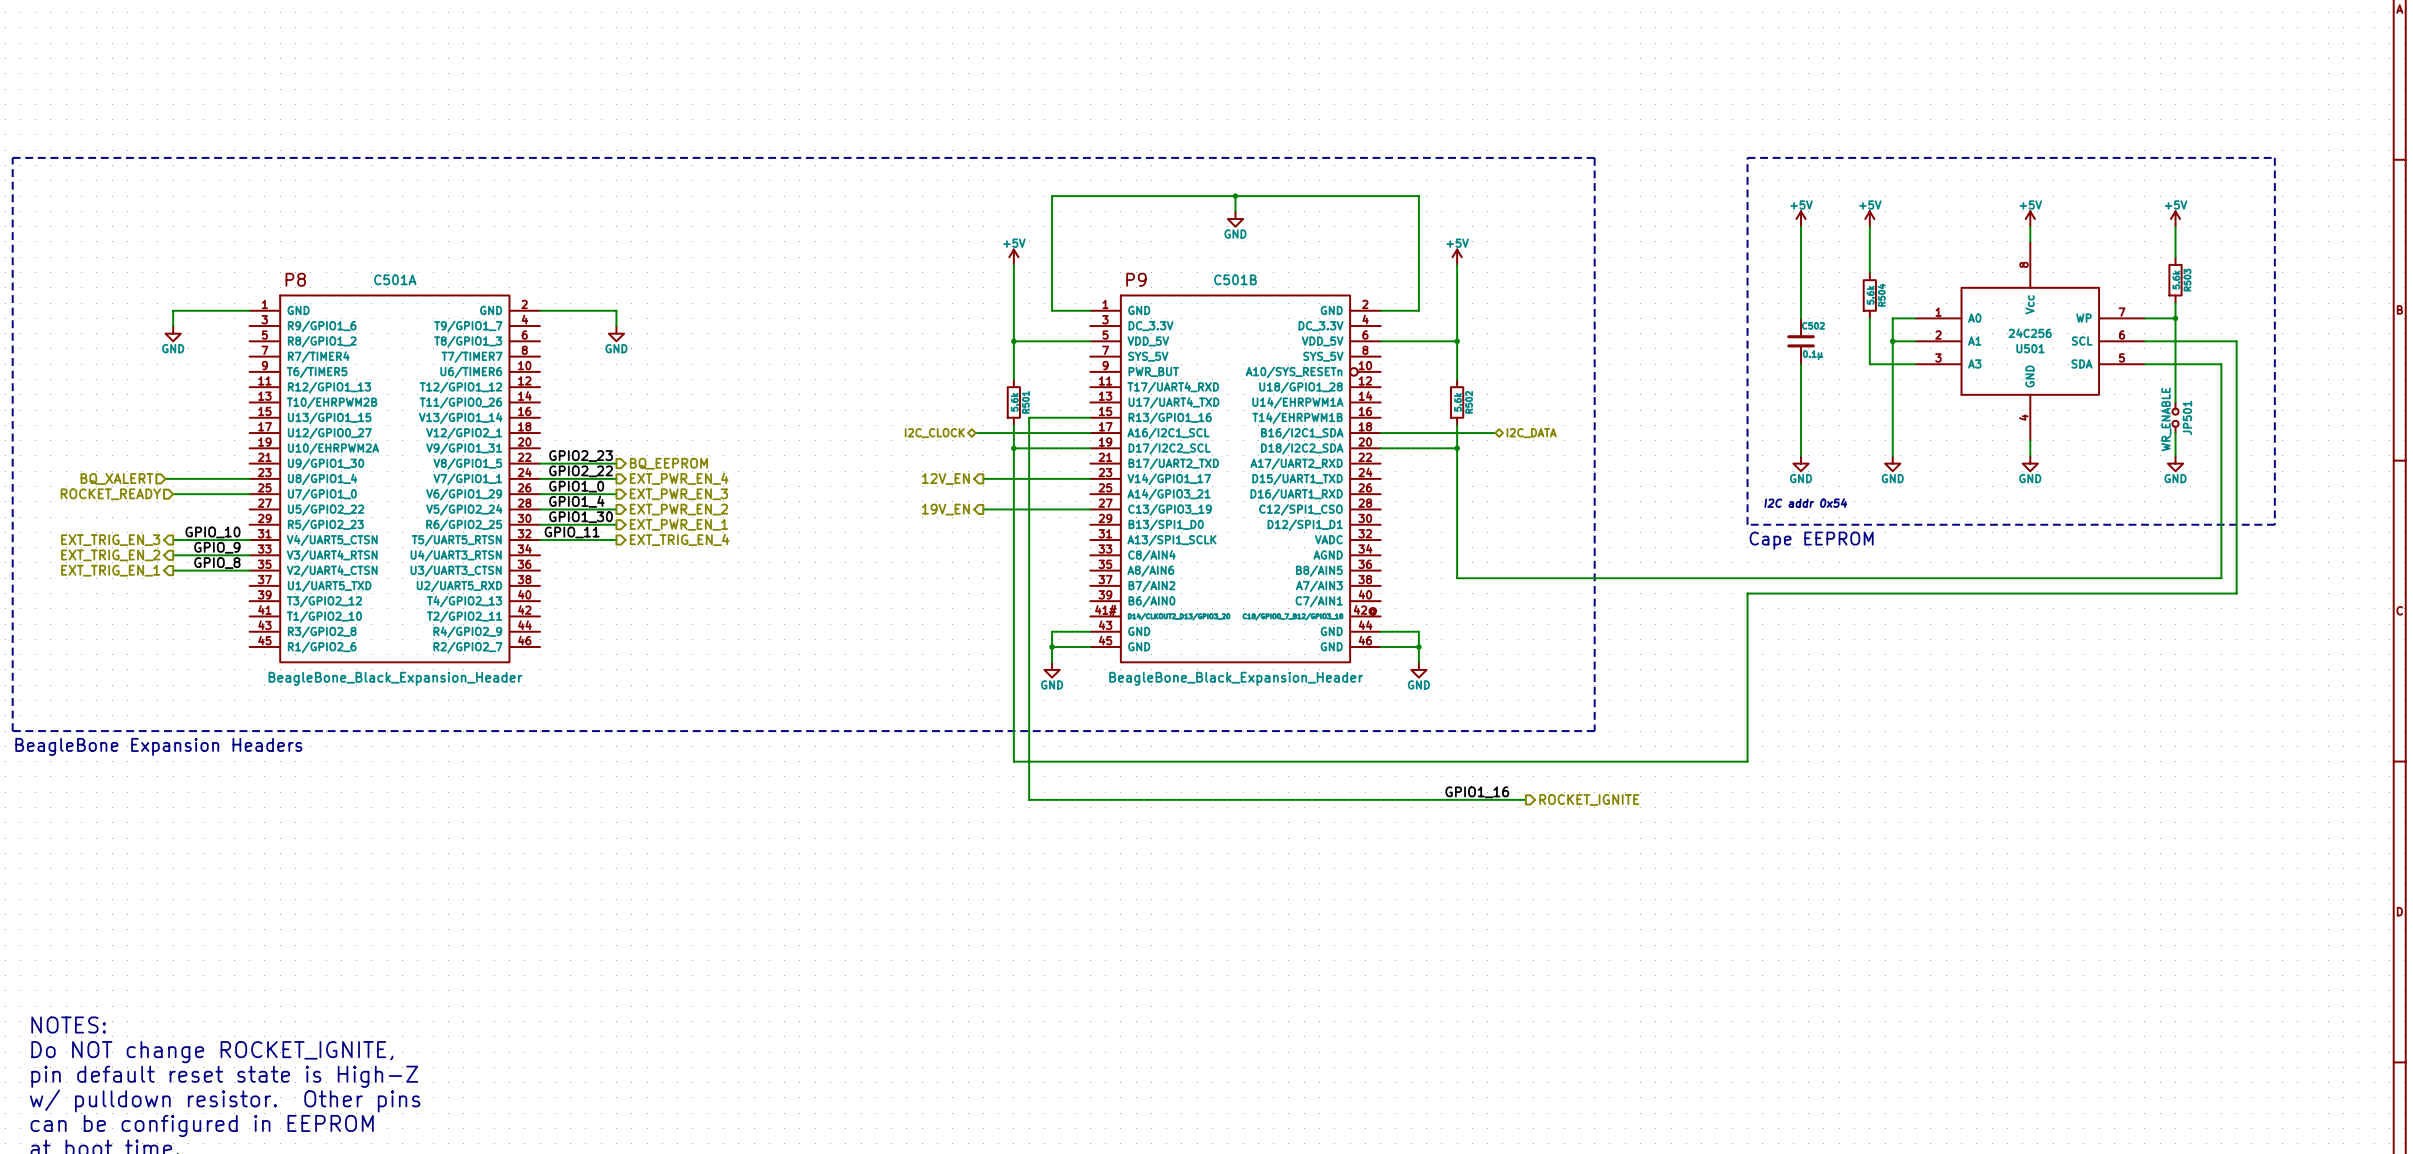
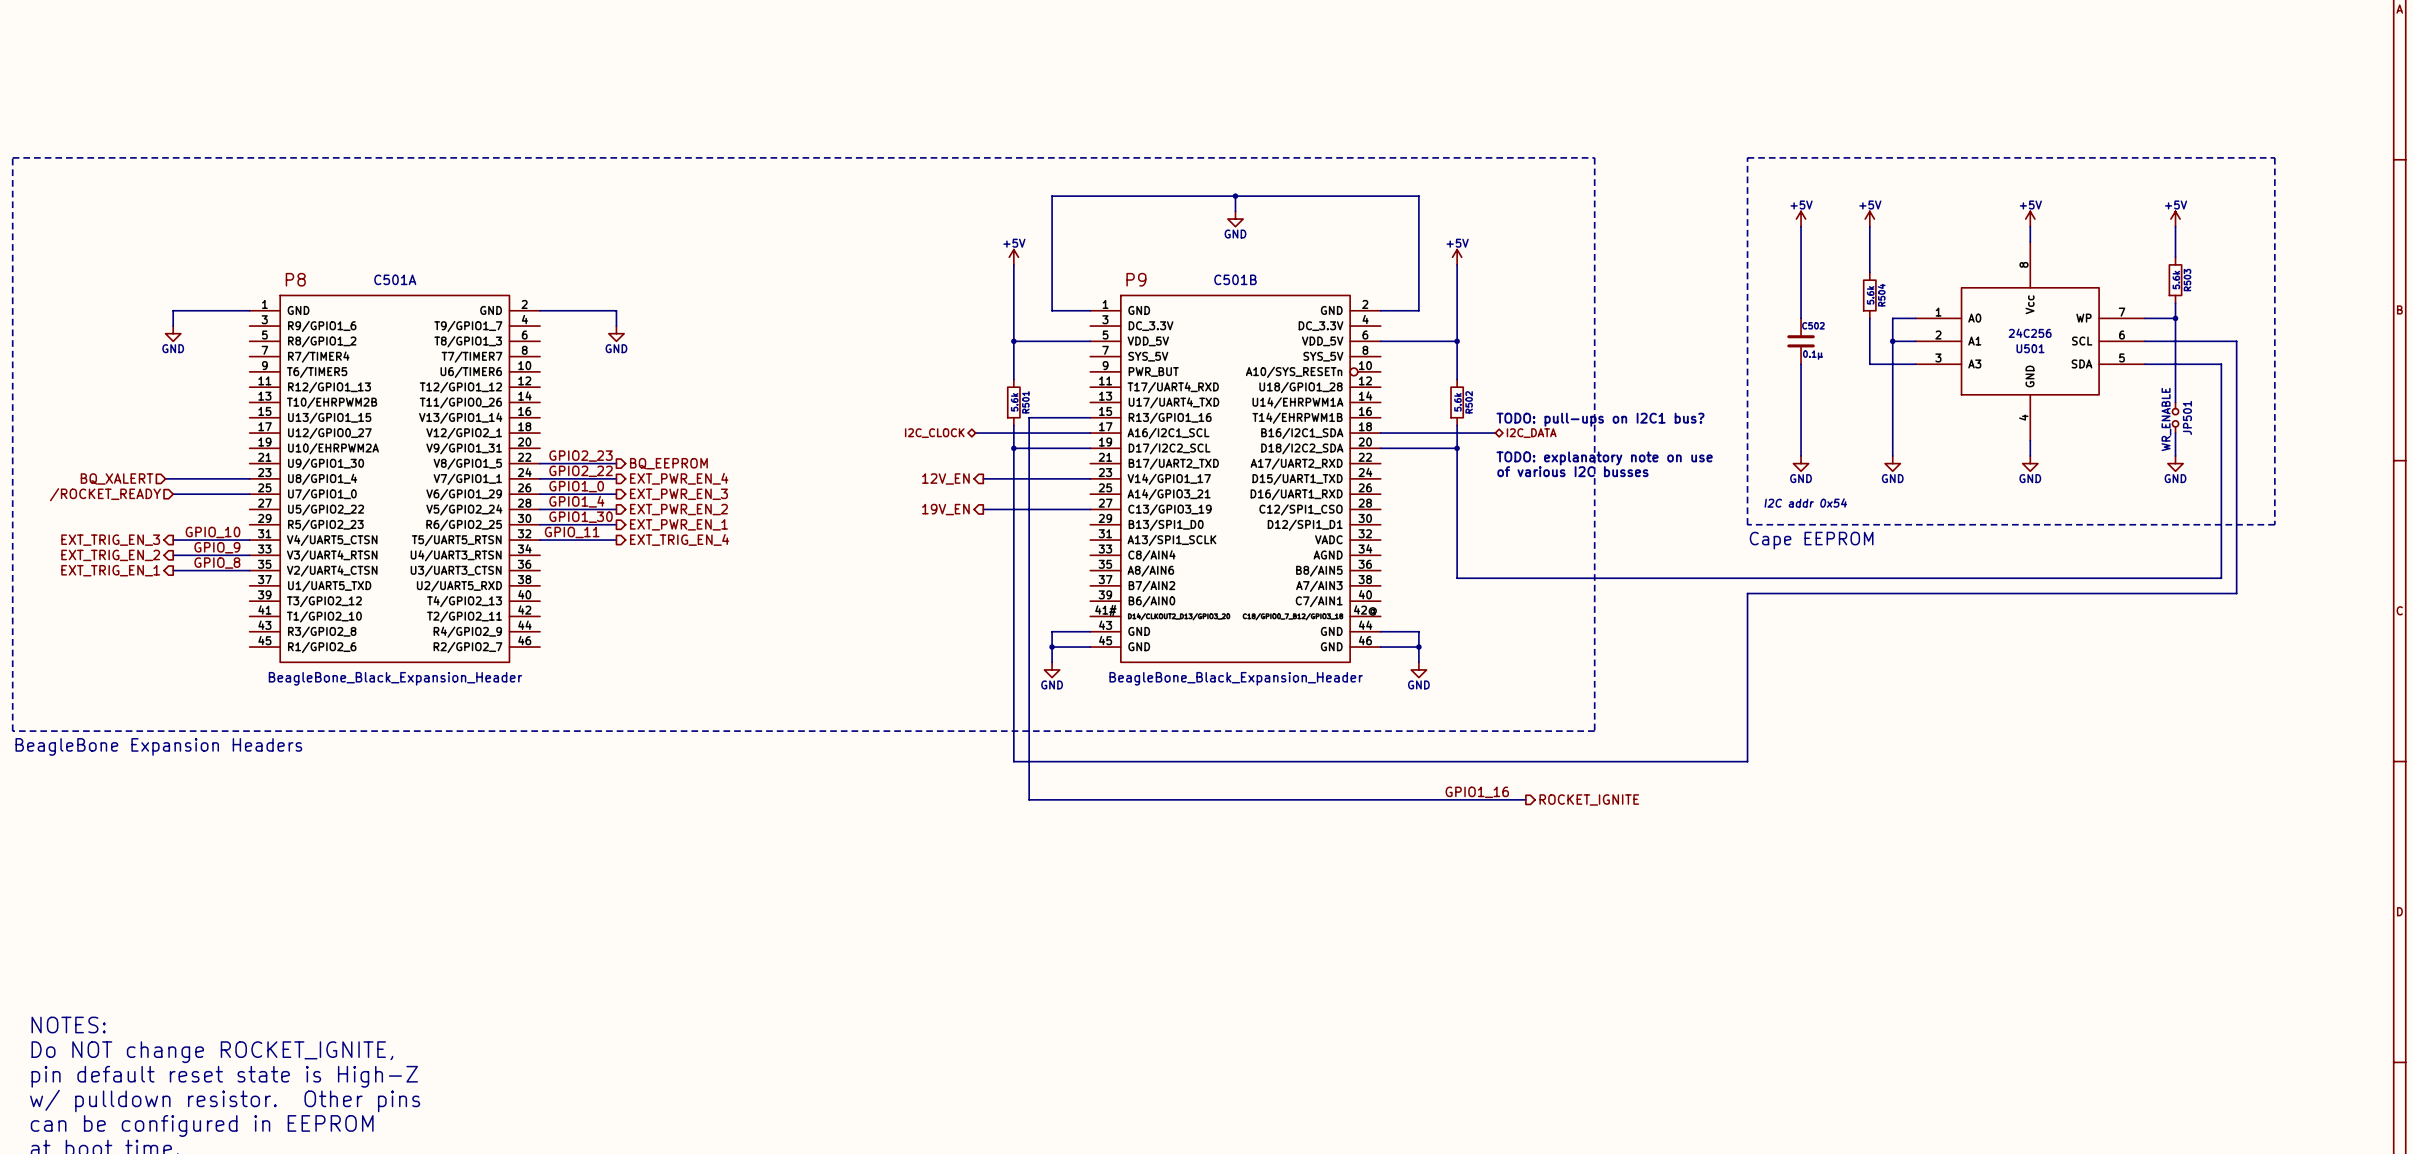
text: none -> TODO: pull-ups on I2C1 bus? (1600, 419)
text: none -> TODO: explanatory note on use (1604, 458)
text: none -> of various I2C busses (1572, 471)
hierarchical label: ROCKET_READY (110, 494) -> /ROCKET_READY (105, 494)

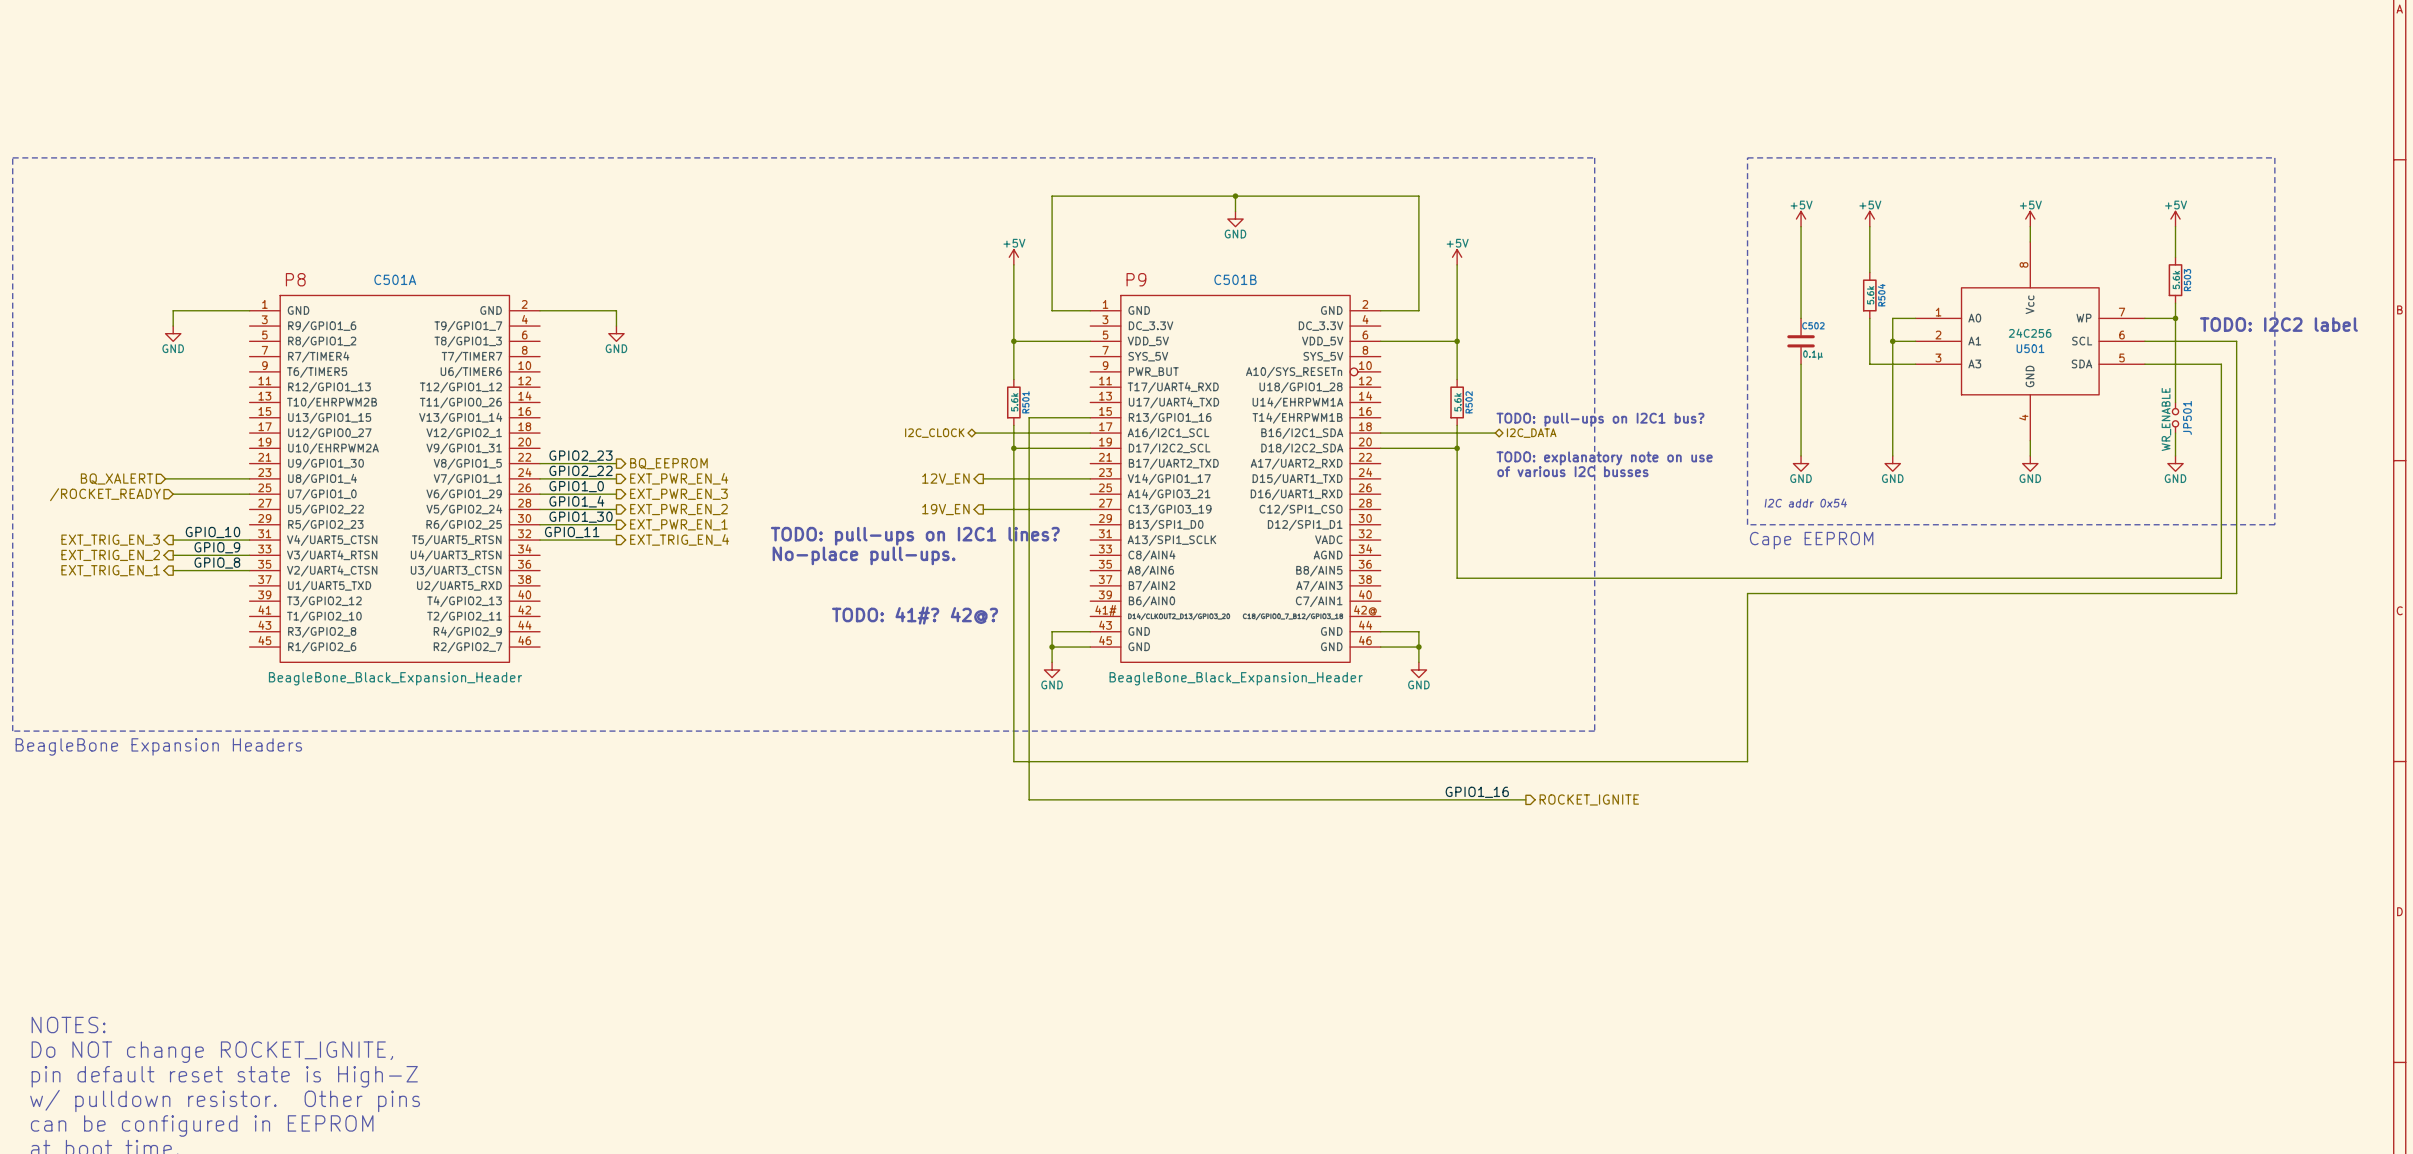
text: none -> TODO: I2C2 label (2278, 324)
text: none -> TODO: pull-ups on I2C1 lines? (915, 536)
text: none -> No-place pull-ups. (864, 555)
text: none -> TODO: 41#? 42@? (915, 615)

